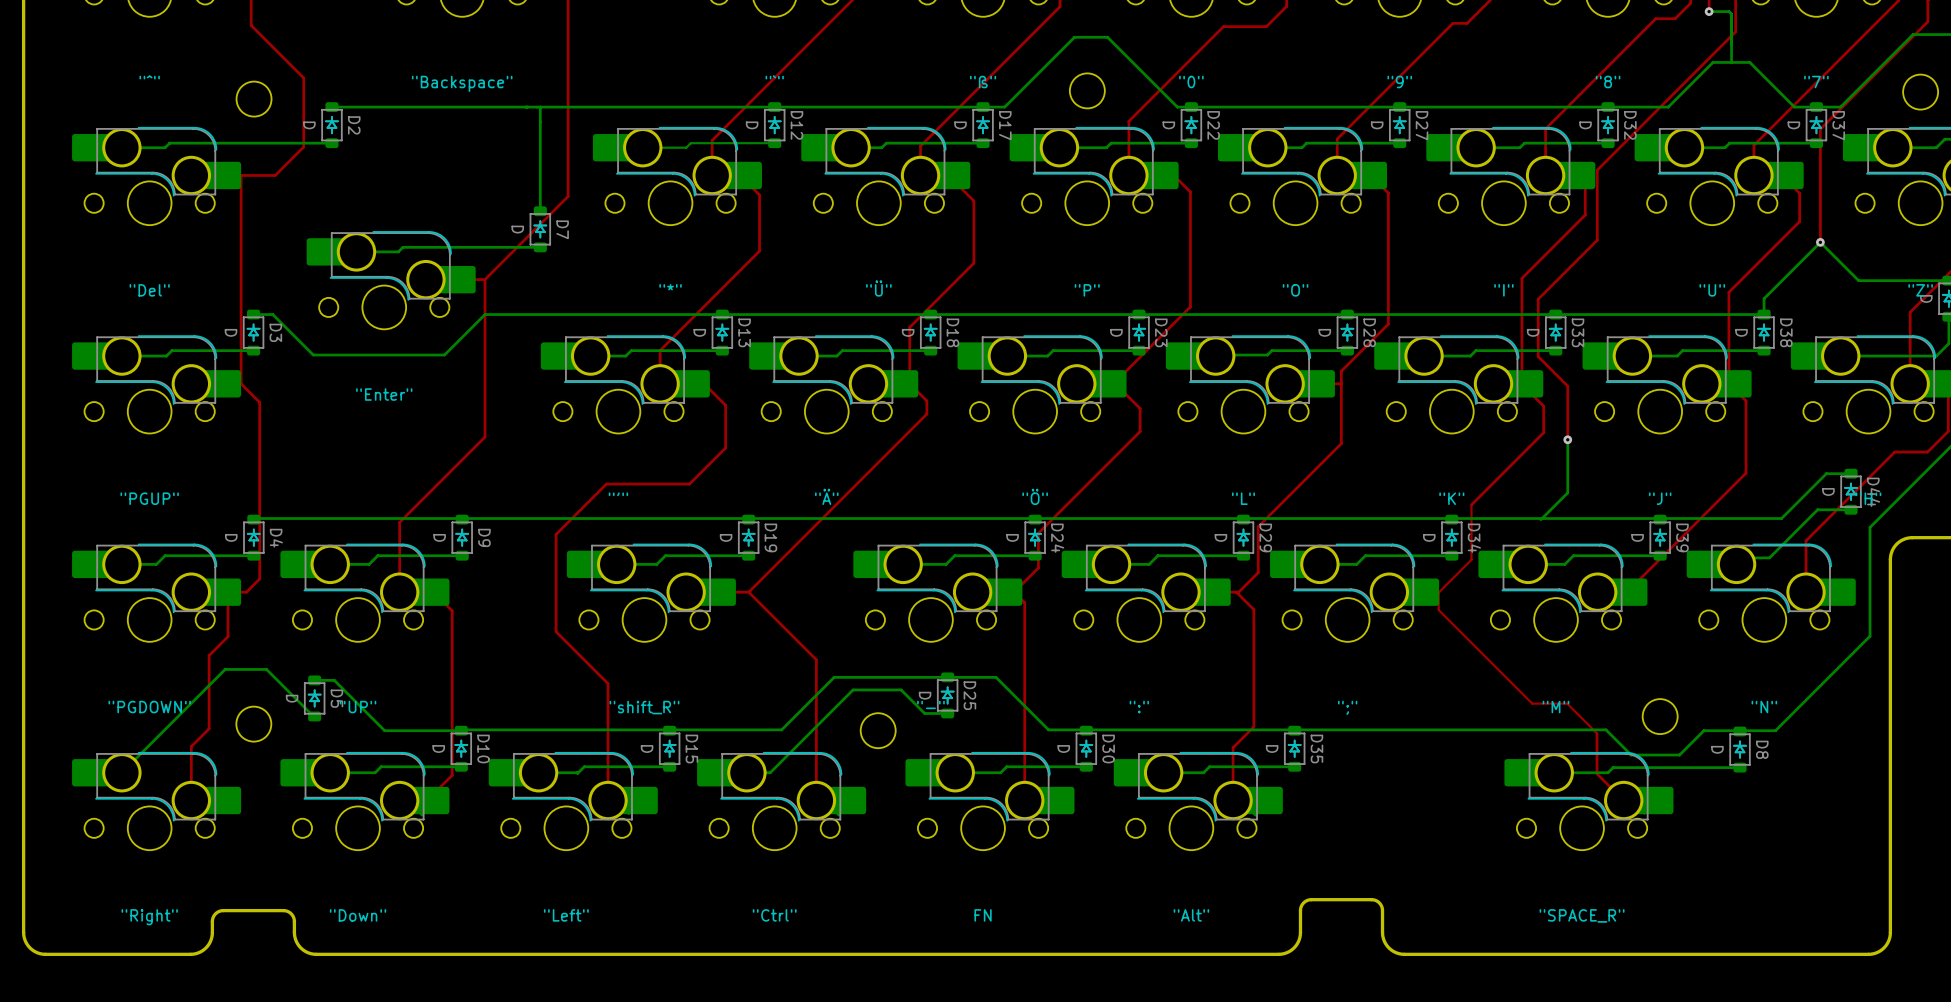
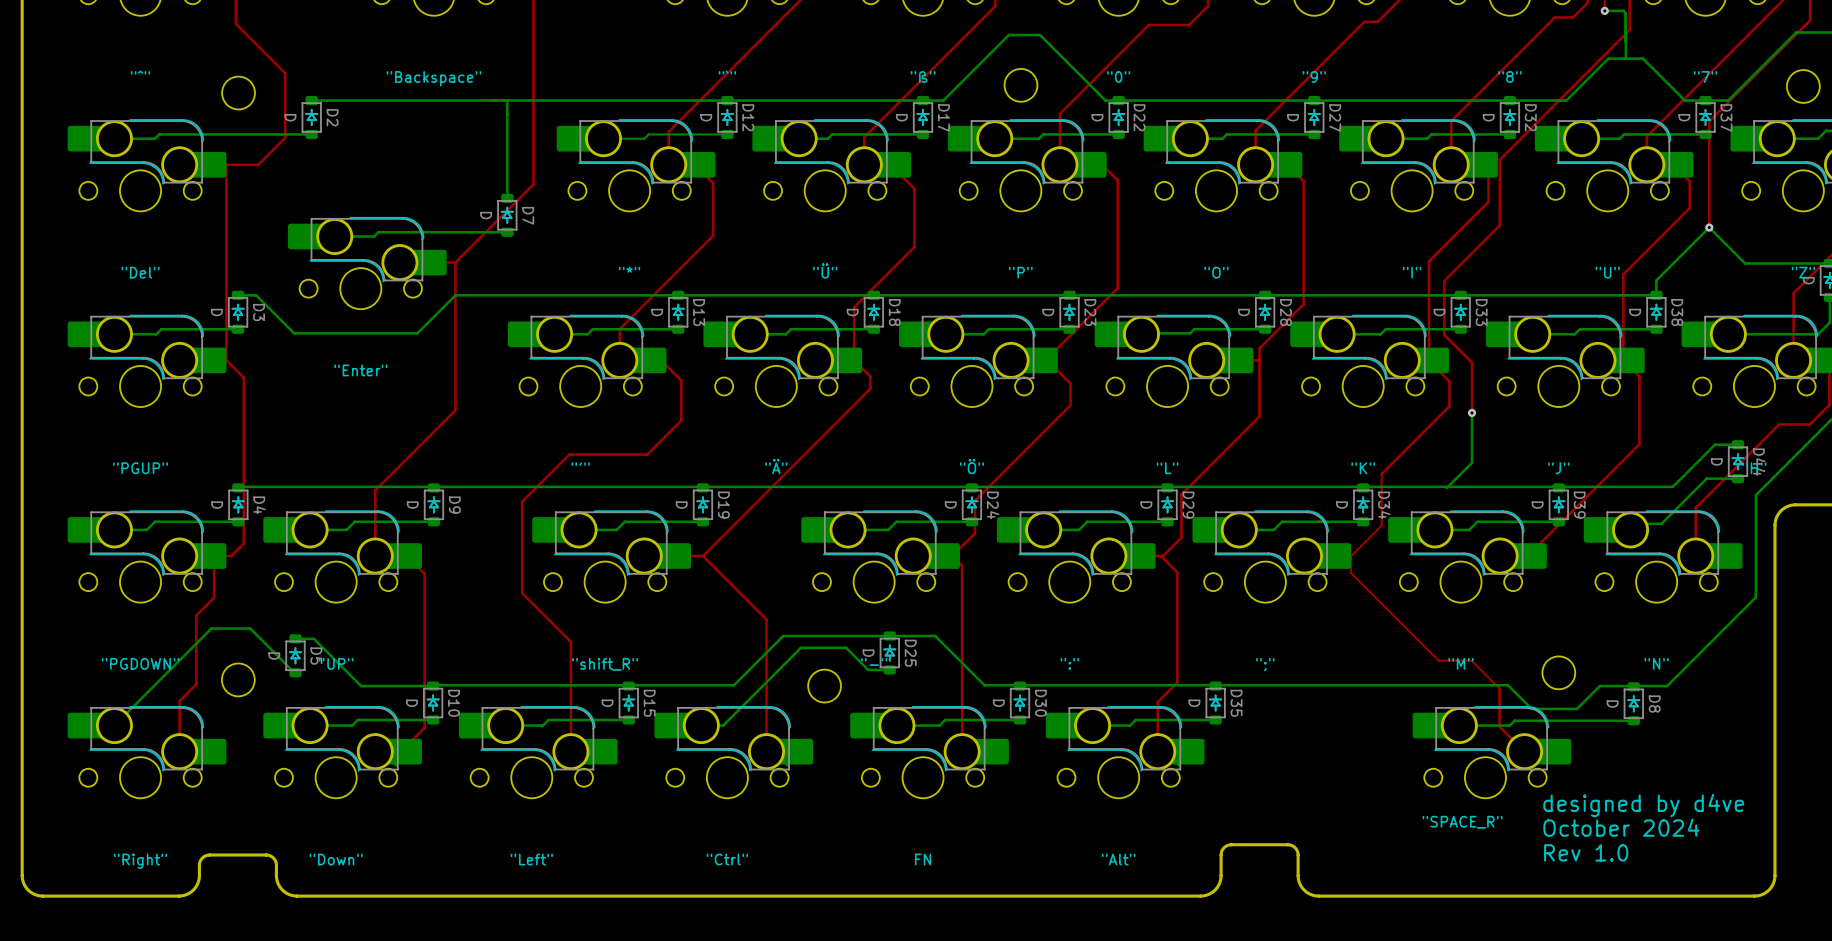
text: none -> designed by d4ve (1643, 805)
text: none -> October 2024 (1621, 827)
text: none -> Rev 1.0 (1586, 852)
part value position: "SPACE_R" (1582, 915) -> "SPACE_R" (1462, 822)

